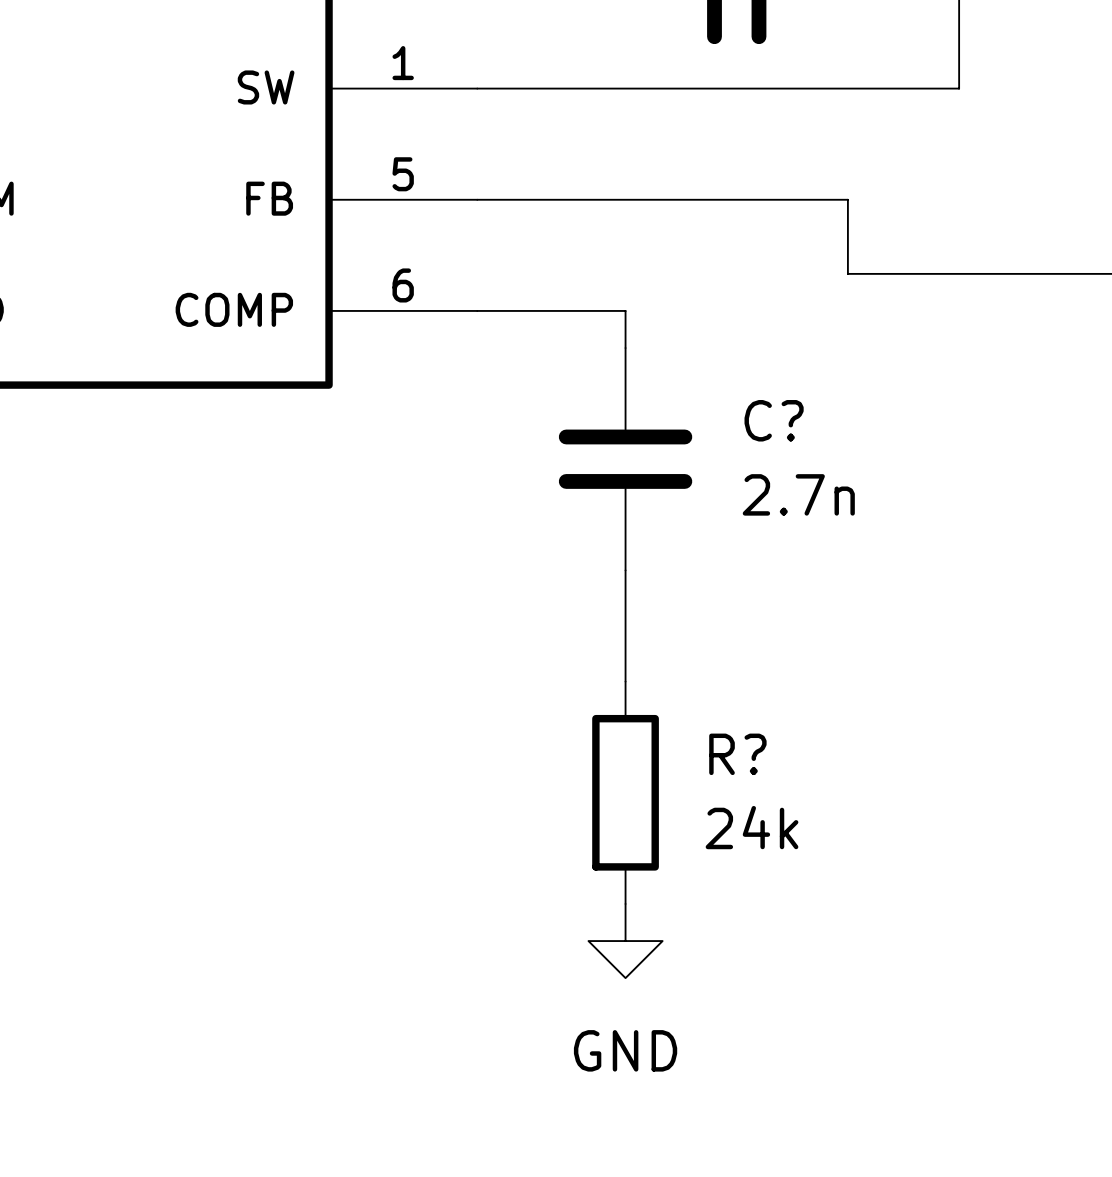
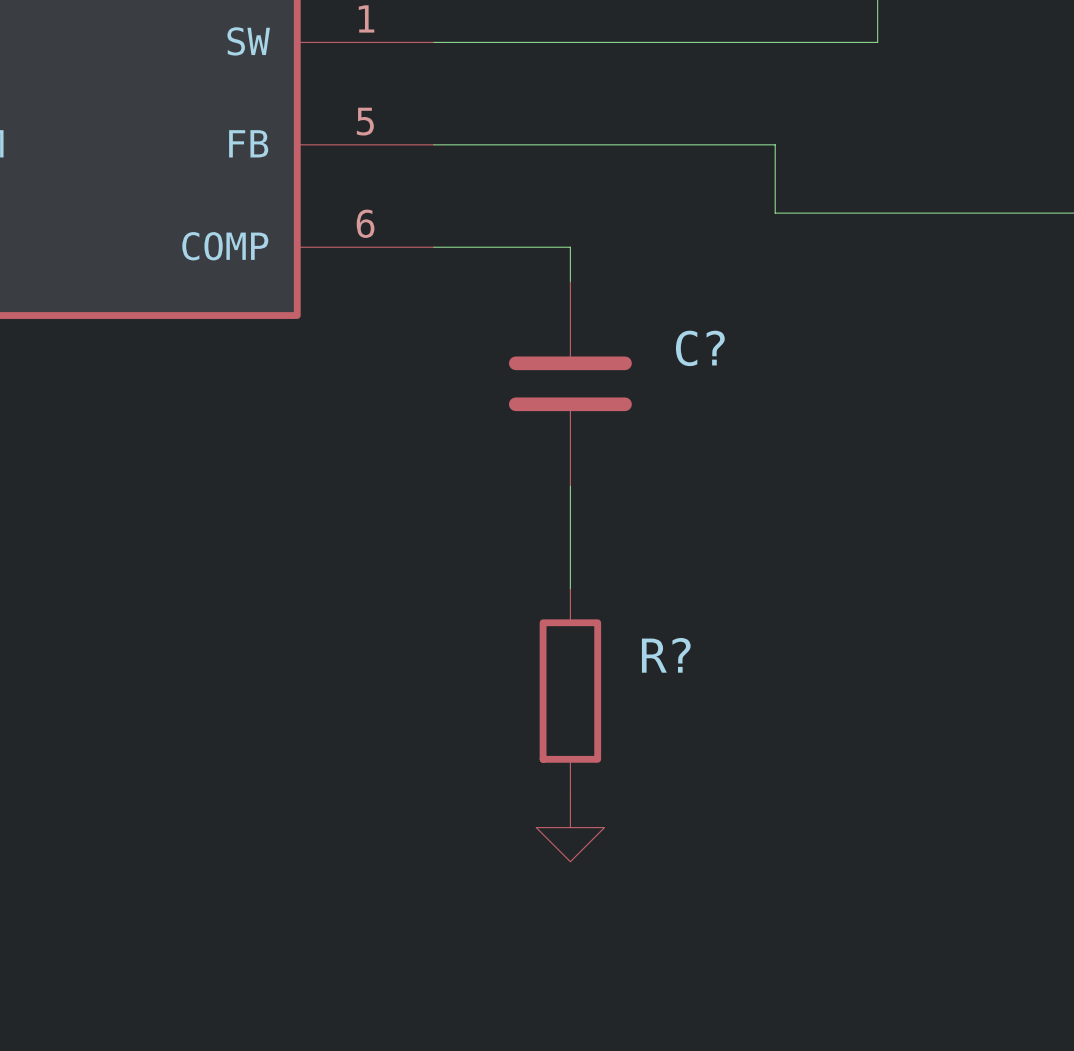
C? value: 2.7n (798, 494) -> none
R? value: 24k (752, 827) -> none
power symbol text: GND (625, 1050) -> none

